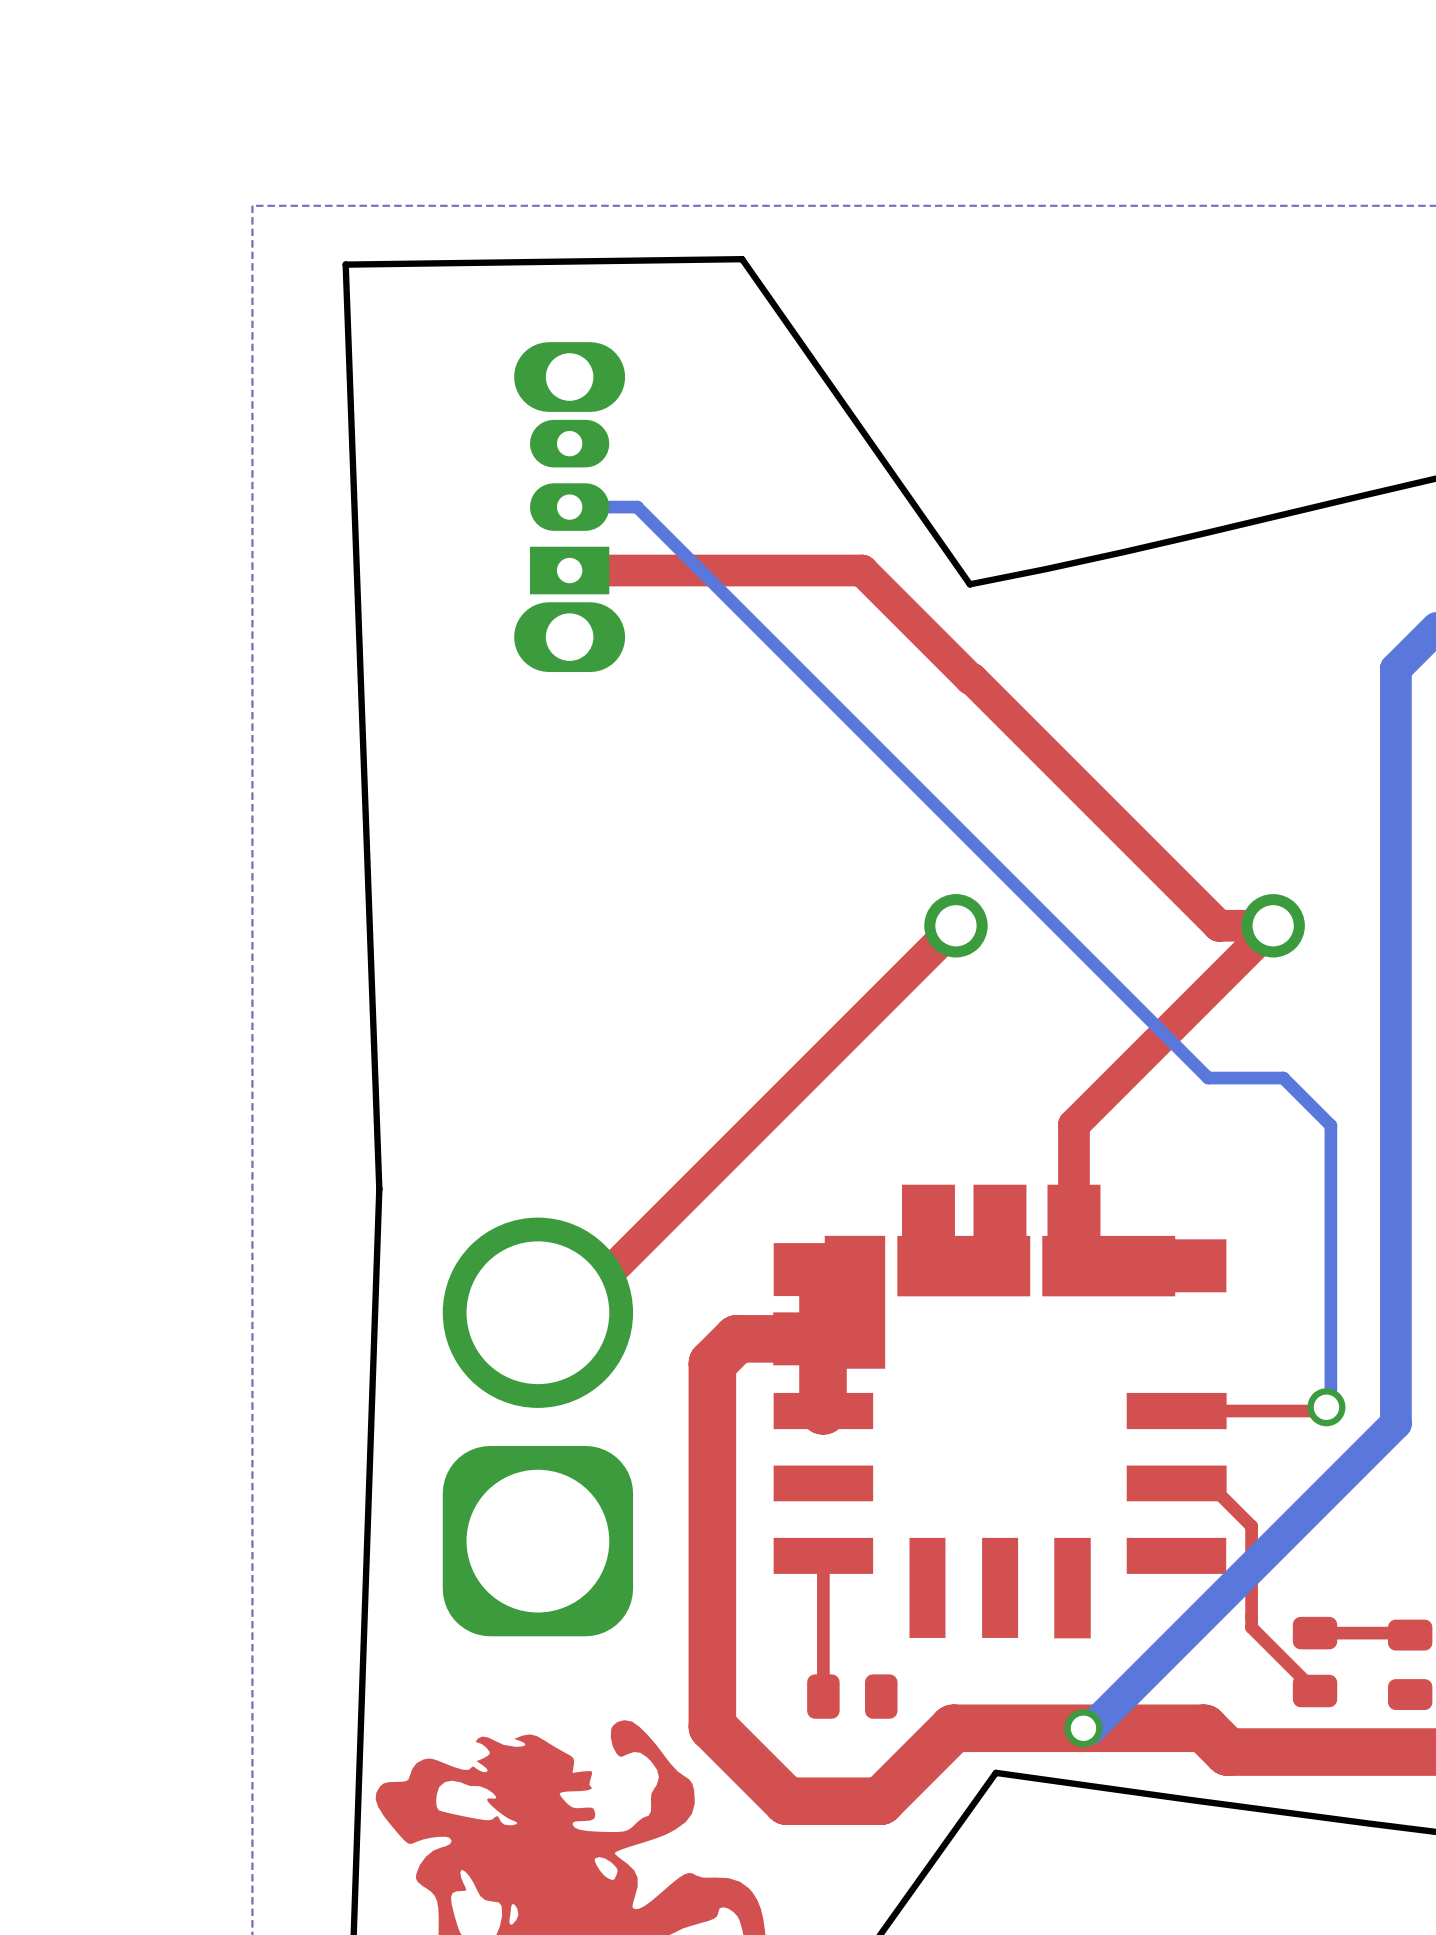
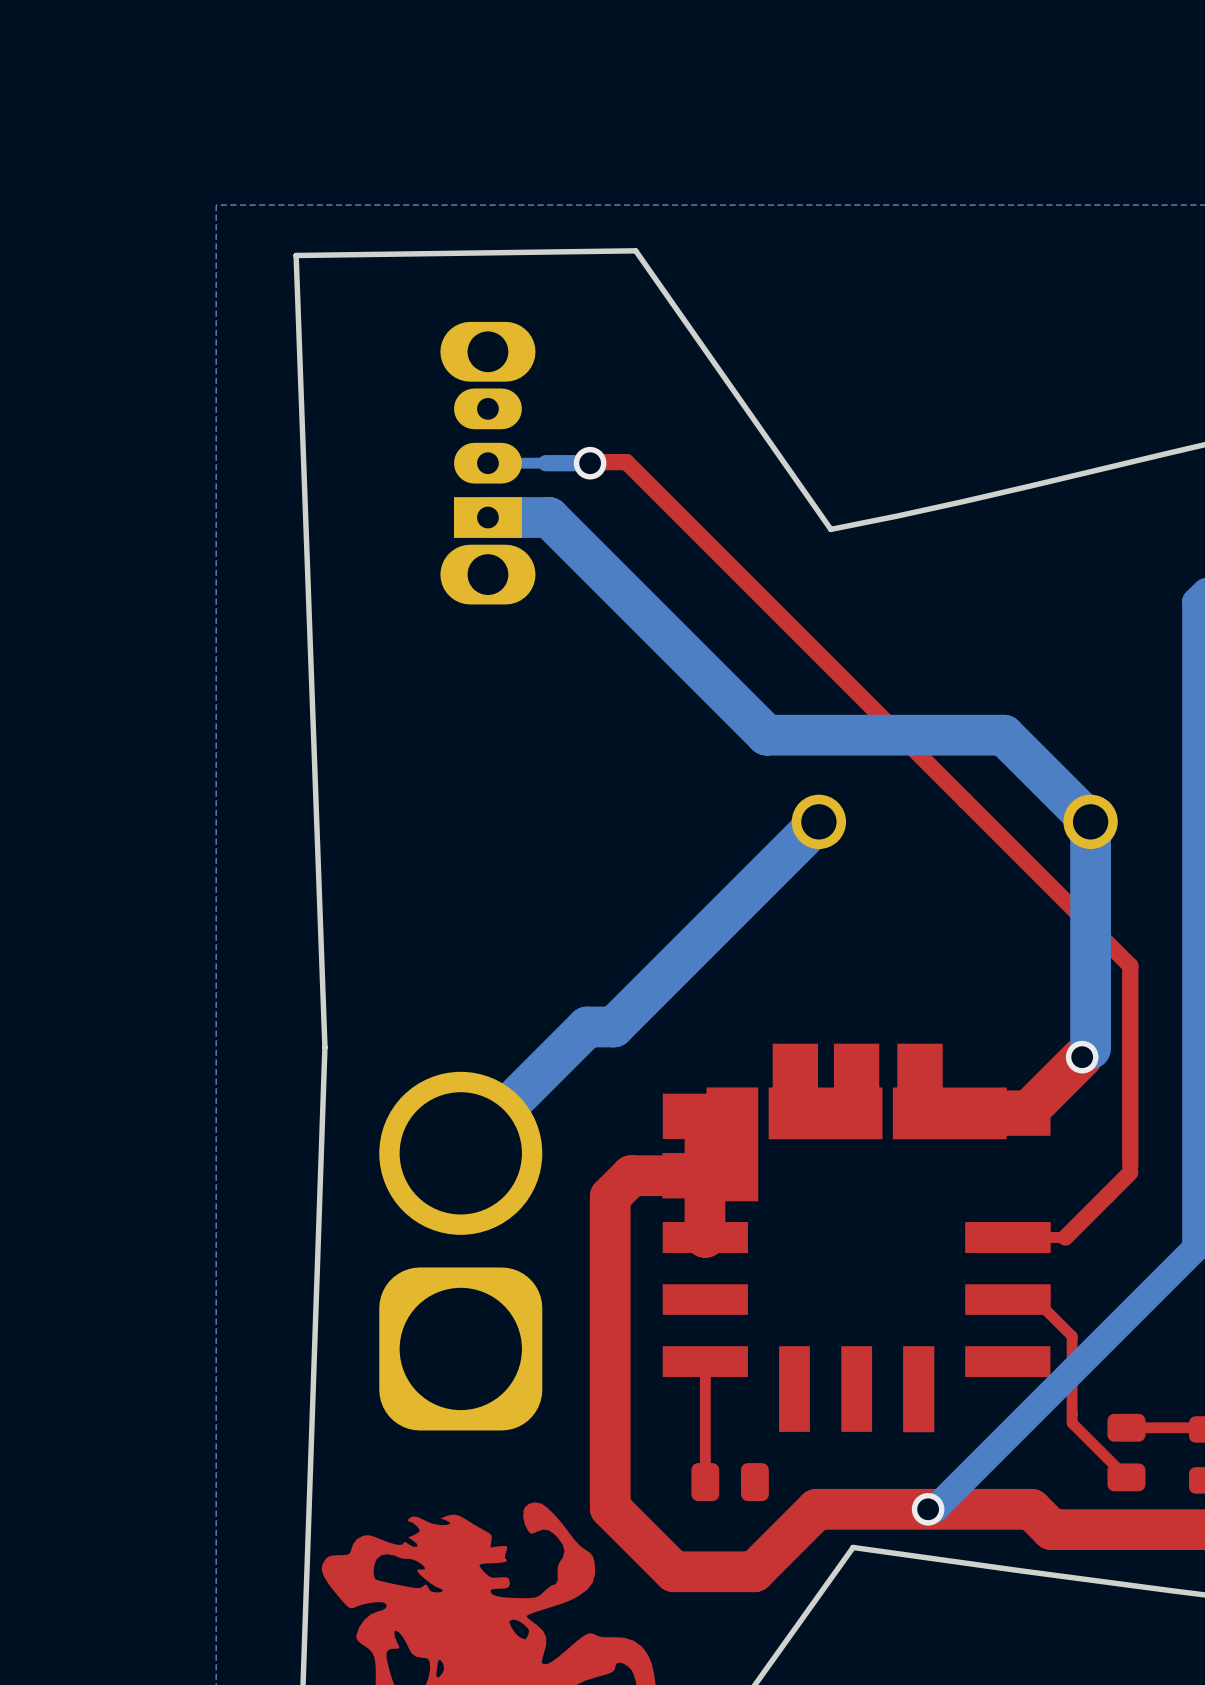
bottom track: (637, 507) (1208, 1078) (1283, 1078) (1330, 1125) (1330, 1411) -> (545, 463) (590, 463)
via: none -> (590, 463)
top track: (569, 570) (862, 570) (1218, 925) (1273, 925) (1073, 1124) (1073, 1234) -> none
bottom track: none -> (487, 517) (549, 517) (766, 735) (1003, 735) (1090, 821) (1090, 1048) (1082, 1057)
top track: (955, 925) (568, 1312) -> none
bottom track: none -> (818, 821) (613, 1026) (587, 1026) (460, 1153)
top track: none -> (1082, 1057) (1026, 1113)
via: none -> (1082, 1057)
top track: (1322, 1406) (1317, 1411) (1243, 1411) -> (590, 462) (626, 462) (1130, 965) (1130, 1172) (1065, 1237)
via: (1326, 1407) -> none

